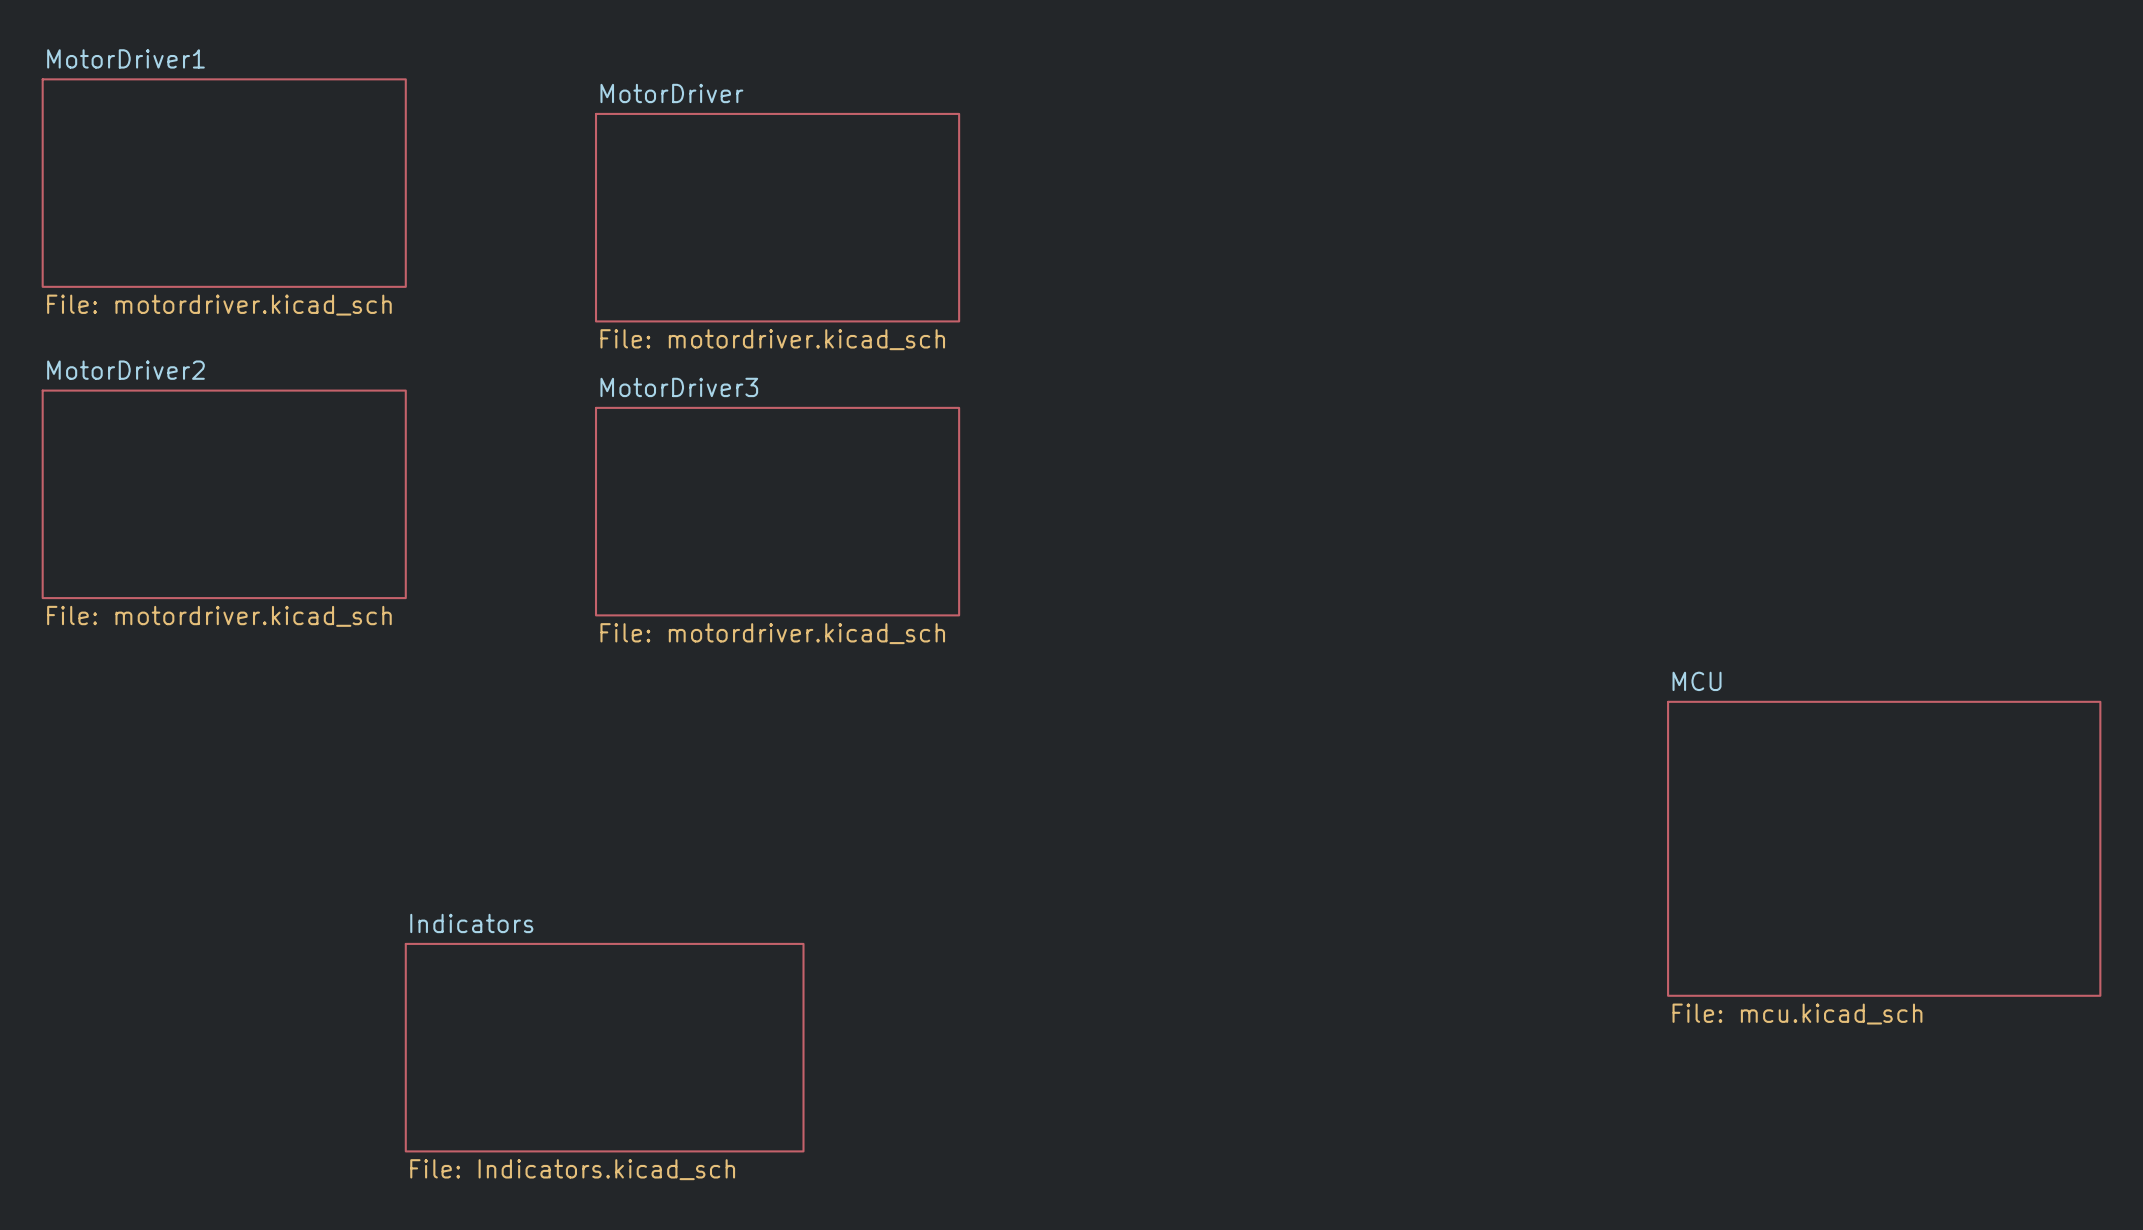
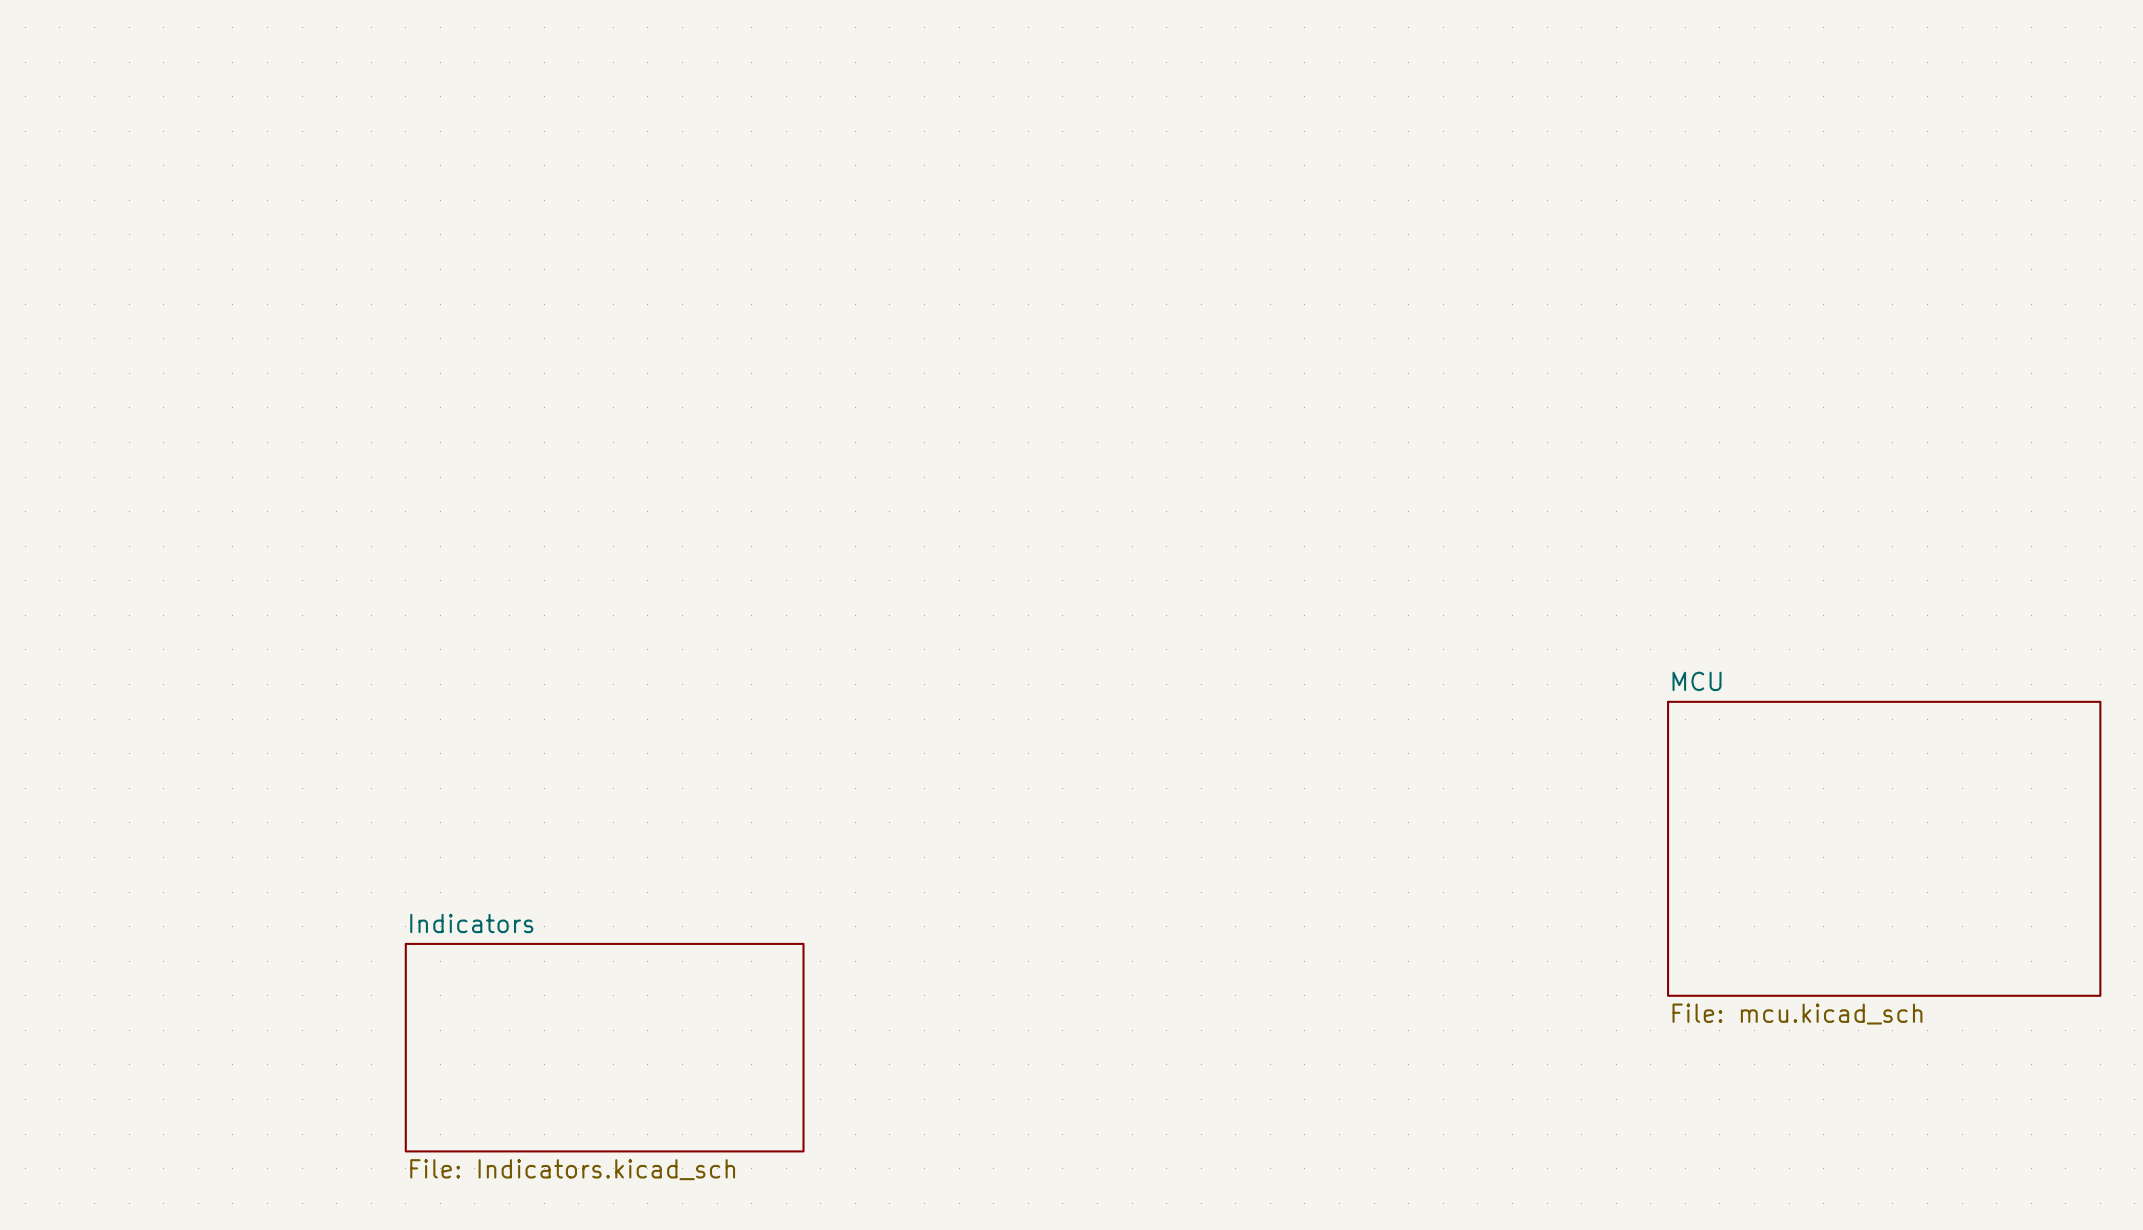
sheet MotorDriver1: File: motordriver.kicad_sch (224, 183) -> none
sheet MotorDriver: File: motordriver.kicad_sch (777, 217) -> none
sheet MotorDriver2: File: motordriver.kicad_sch (224, 494) -> none
sheet MotorDriver3: File: motordriver.kicad_sch (777, 511) -> none

